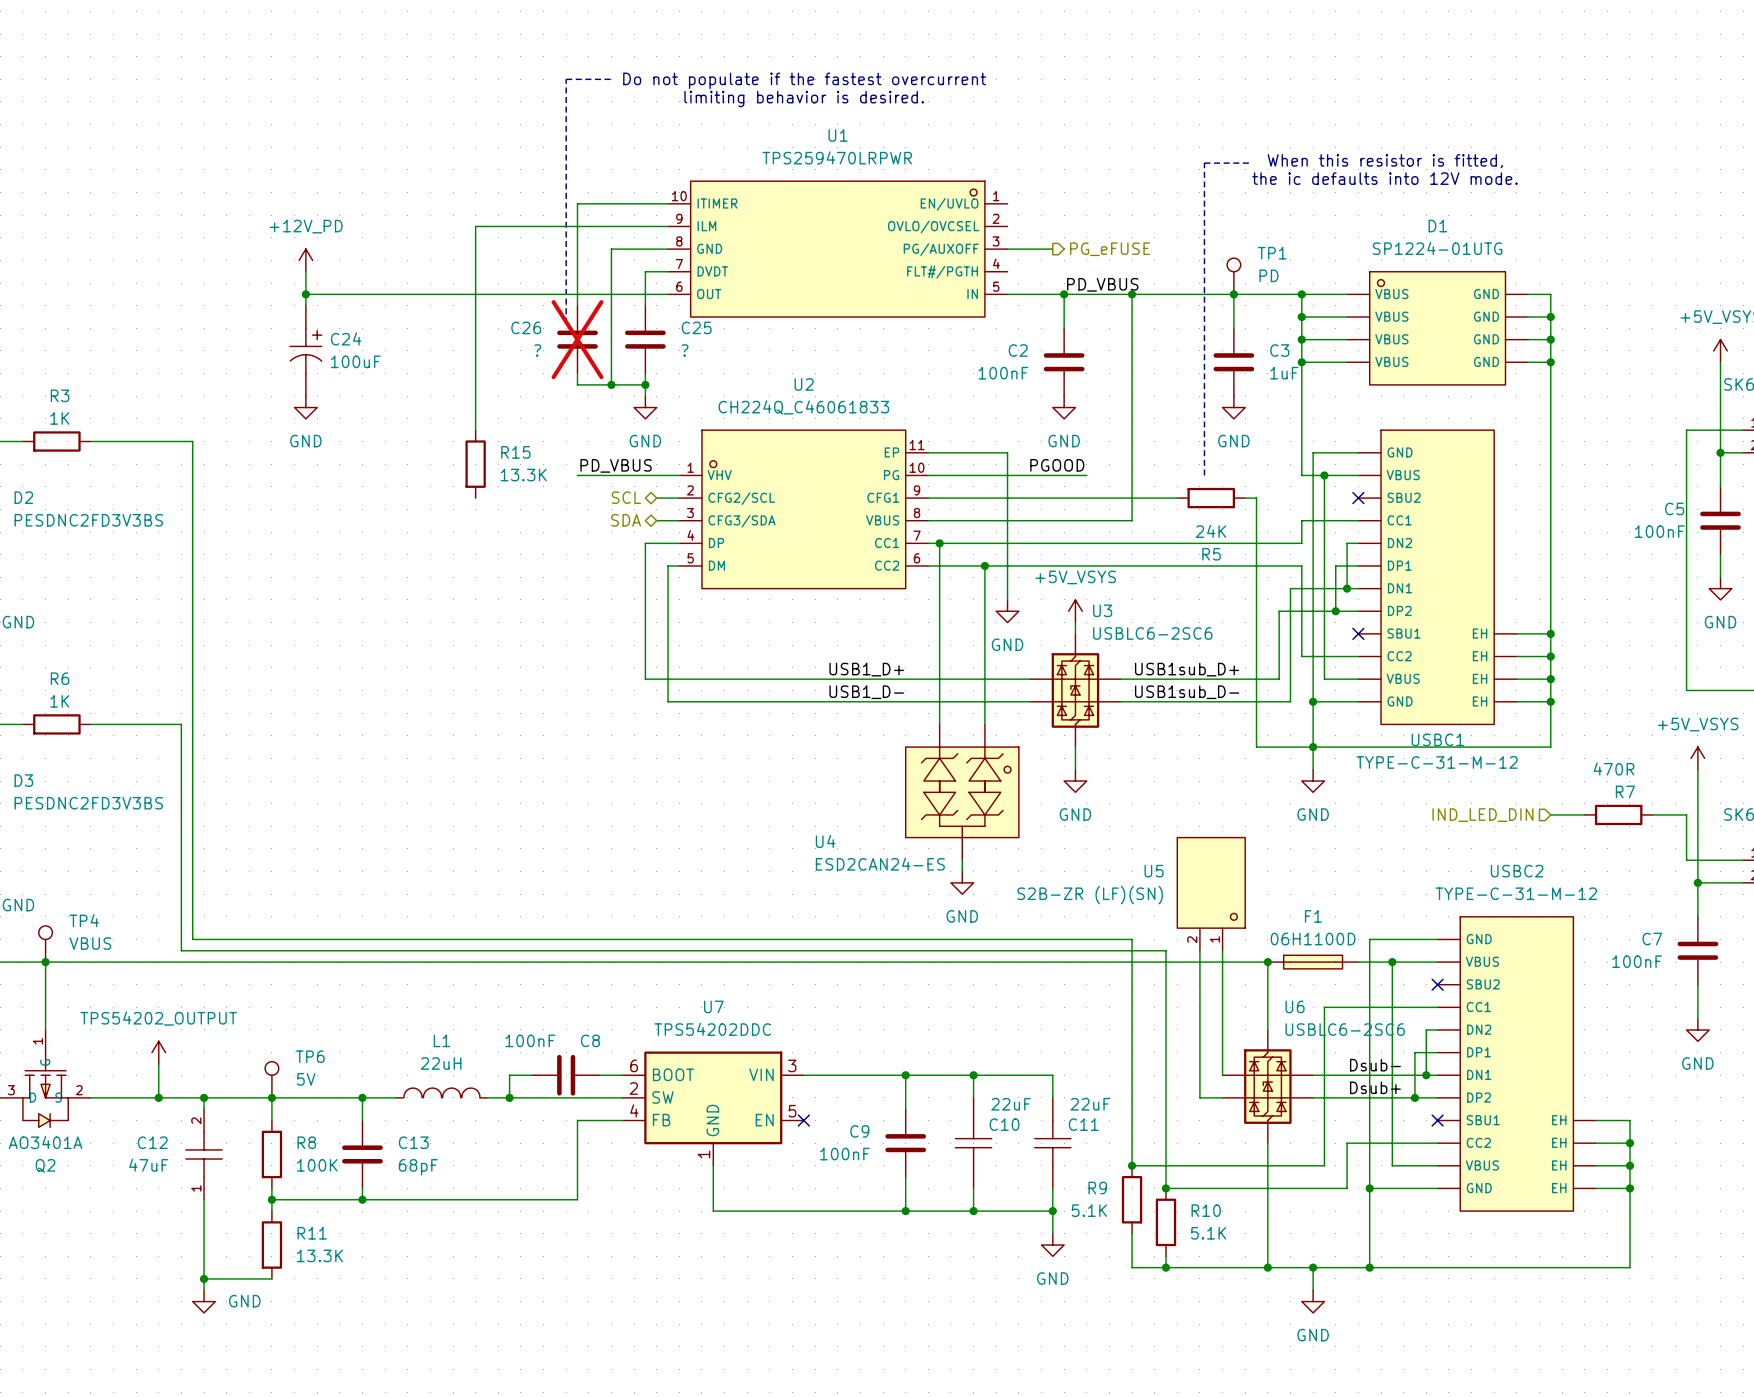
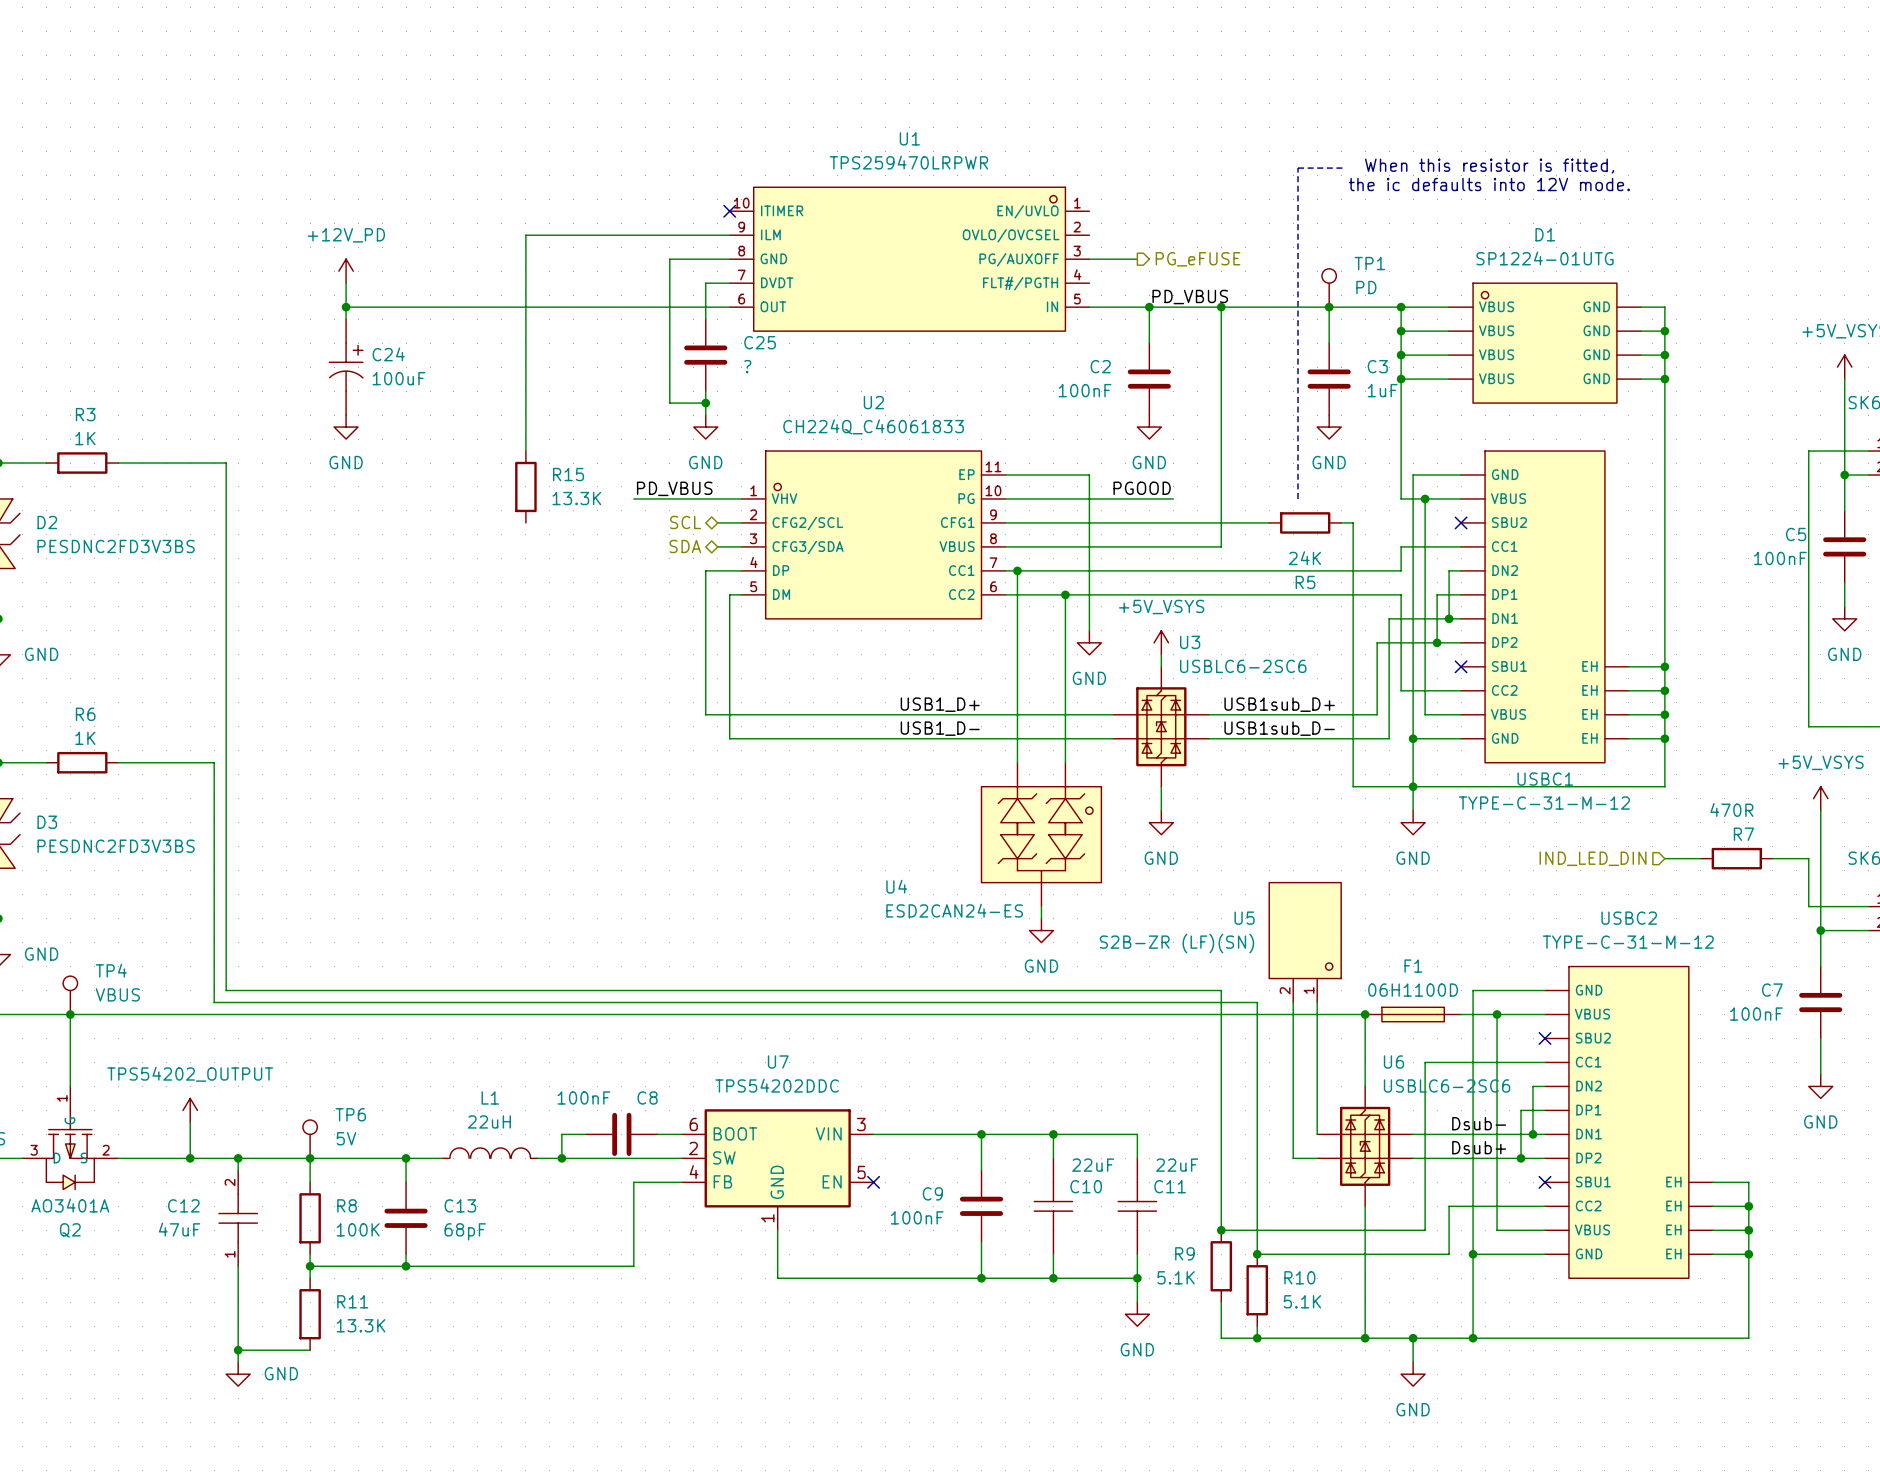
line: (611, 79) (566, 79) (566, 323) -> none
text: Do not populate if the fastest overcurrent (804, 80) -> none
text: limiting behavior is desired. (804, 99) -> none
wire: (668, 203) (577, 203) (577, 305) -> none
no-connect mark: none -> (729, 211)
C26: ? (577, 339) -> none
wire: (577, 373) (577, 384) (611, 384) -> none
junction: (611, 384) -> none

